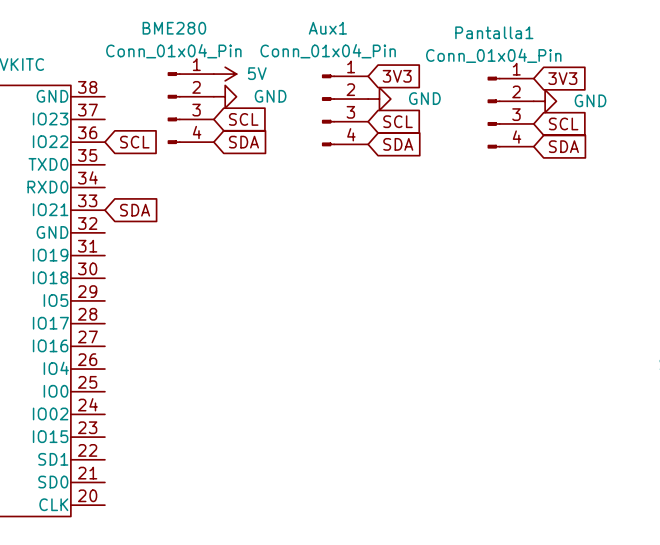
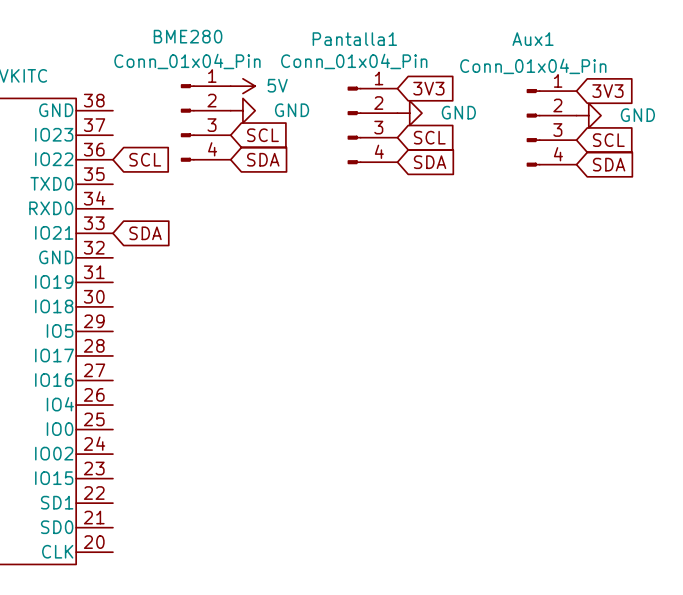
Aux1 name: Aux1 (327, 28) -> Pantalla1 (354, 39)
Pantalla1 name: Pantalla1 (494, 32) -> Aux1 (533, 39)

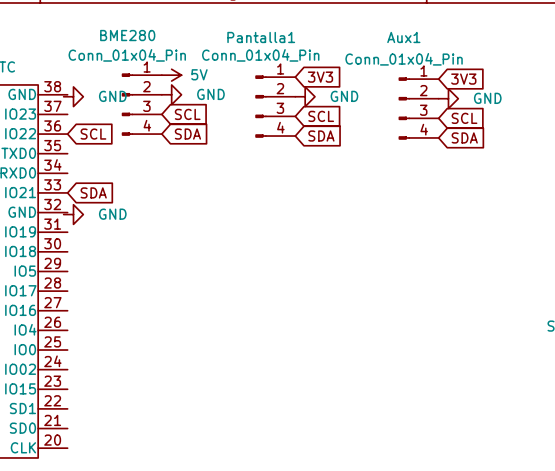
power symbol: none -> GND (73, 96)
power symbol: none -> GND (73, 214)

